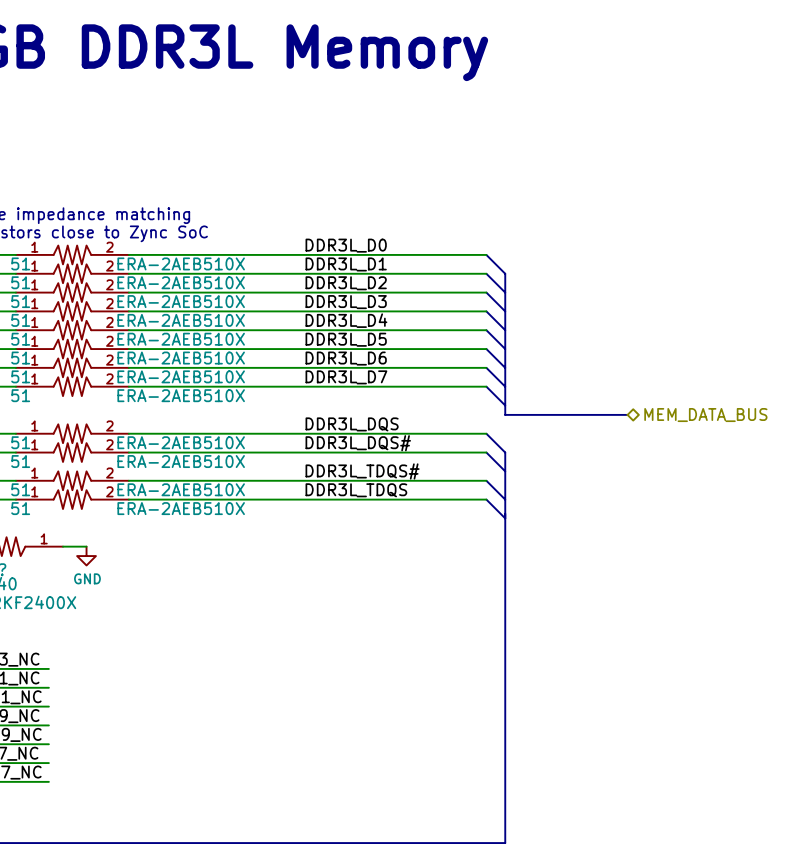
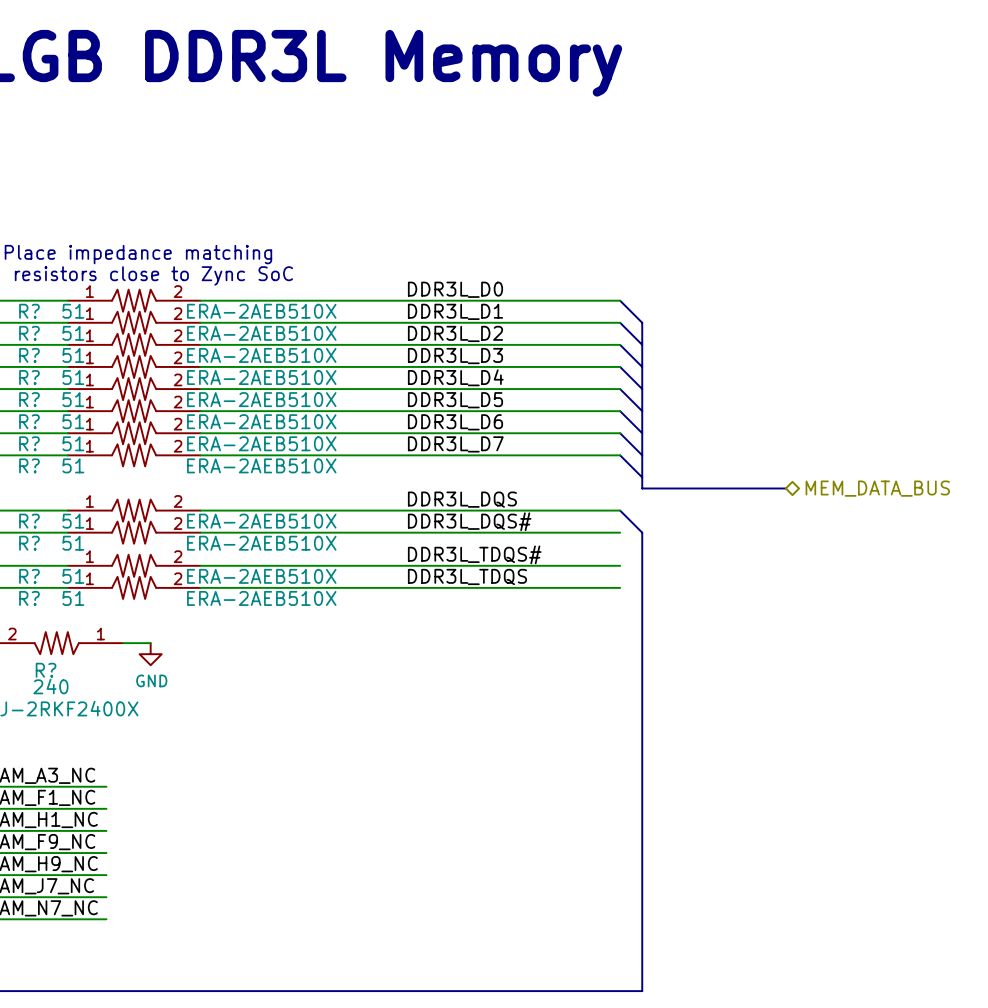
bus: (486, 452) (505, 471) -> none
bus: (486, 480) (505, 499) -> none
bus: (486, 499) (505, 518) -> none

